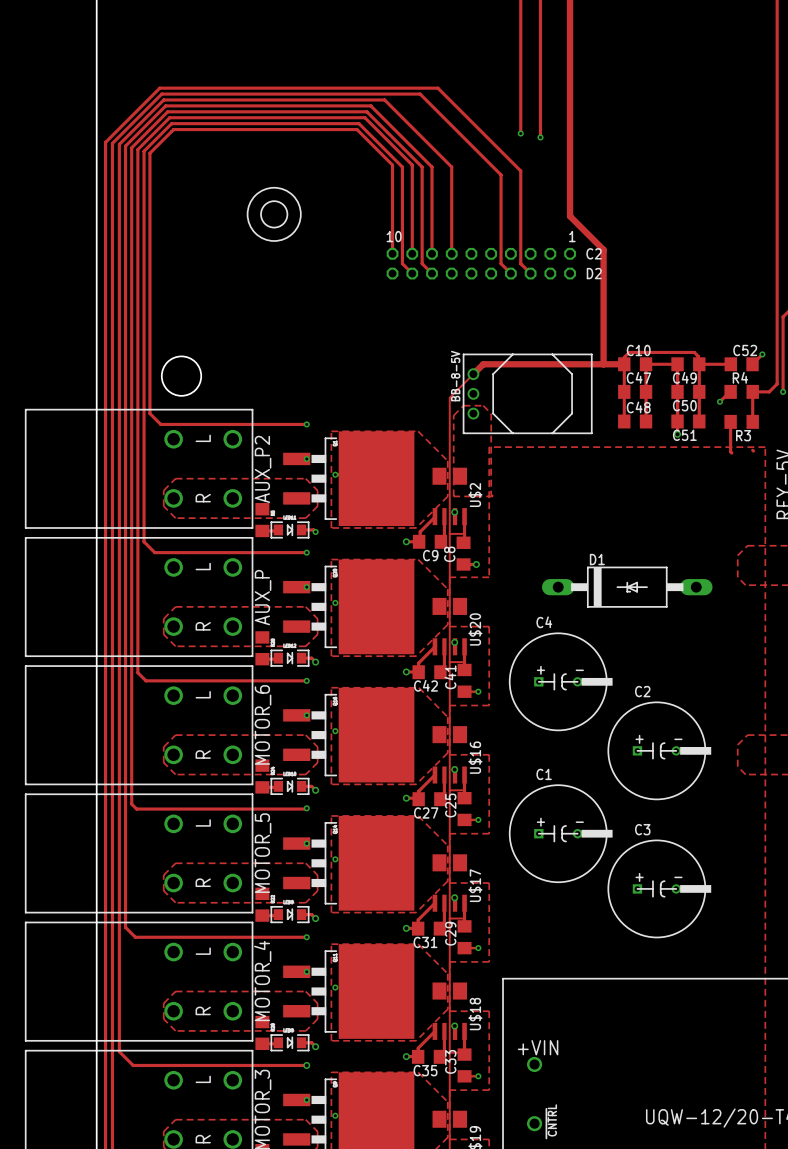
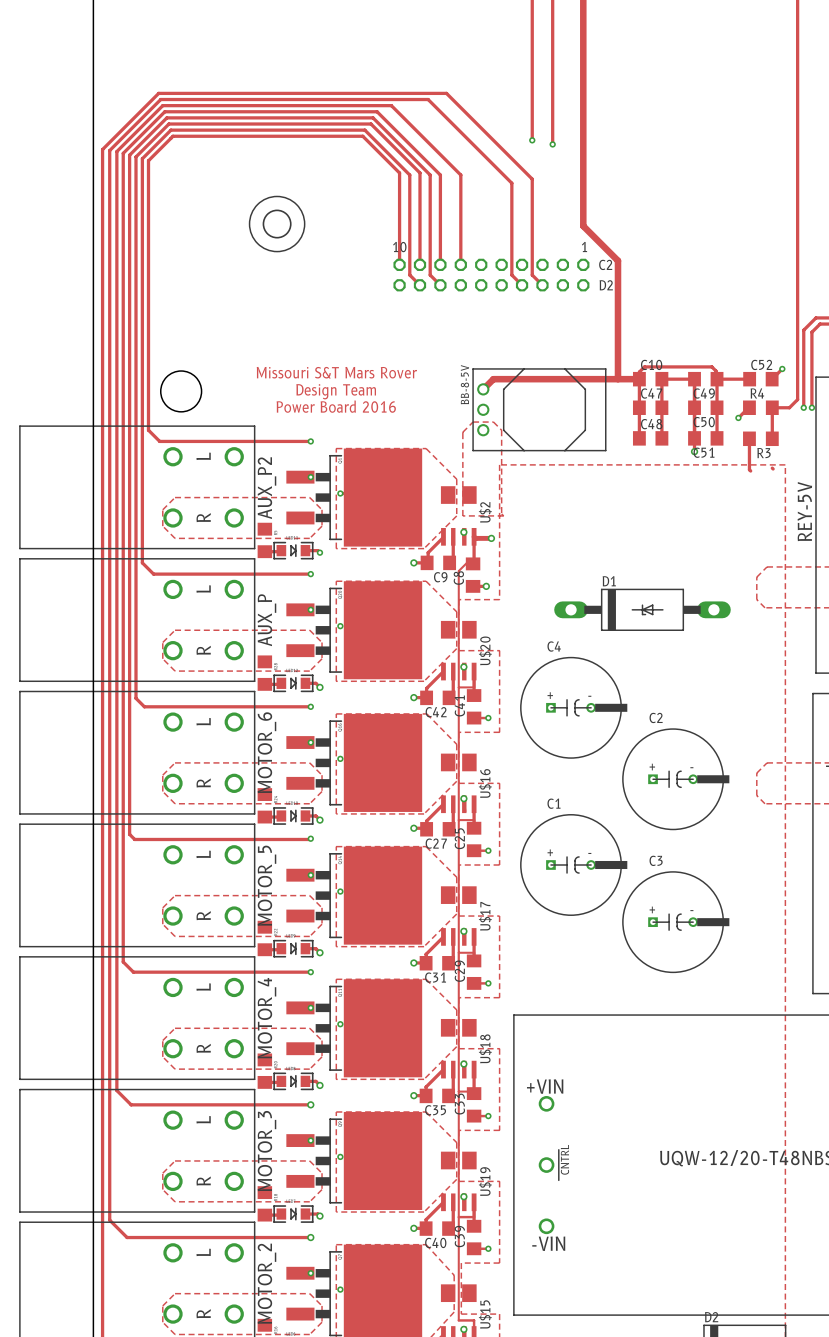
text: none -> Missouri S&T Mars Rover (336, 372)
track: (473, 374) (449, 397) (449, 549) -> (466, 562) (458, 571)
text: none -> Design Team (336, 391)
text: none -> Power Board 2016 (336, 406)
track: none -> (474, 536) (491, 538)
via: none -> (491, 538)
track: (449, 533) (464, 533) -> none

